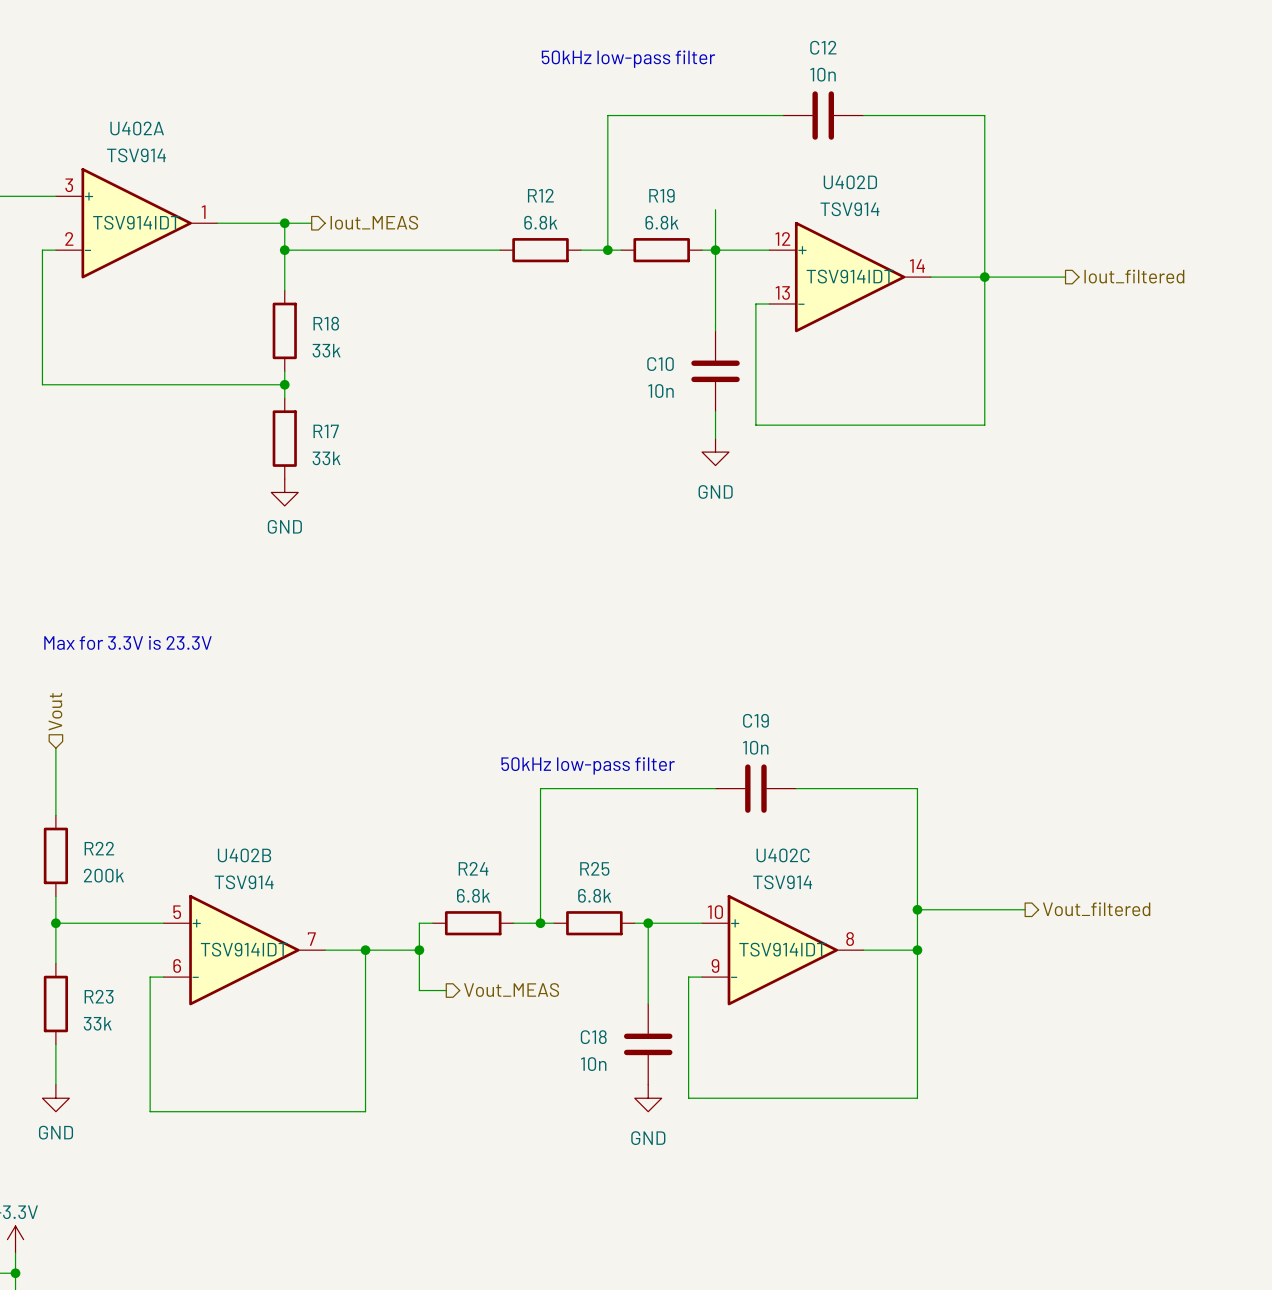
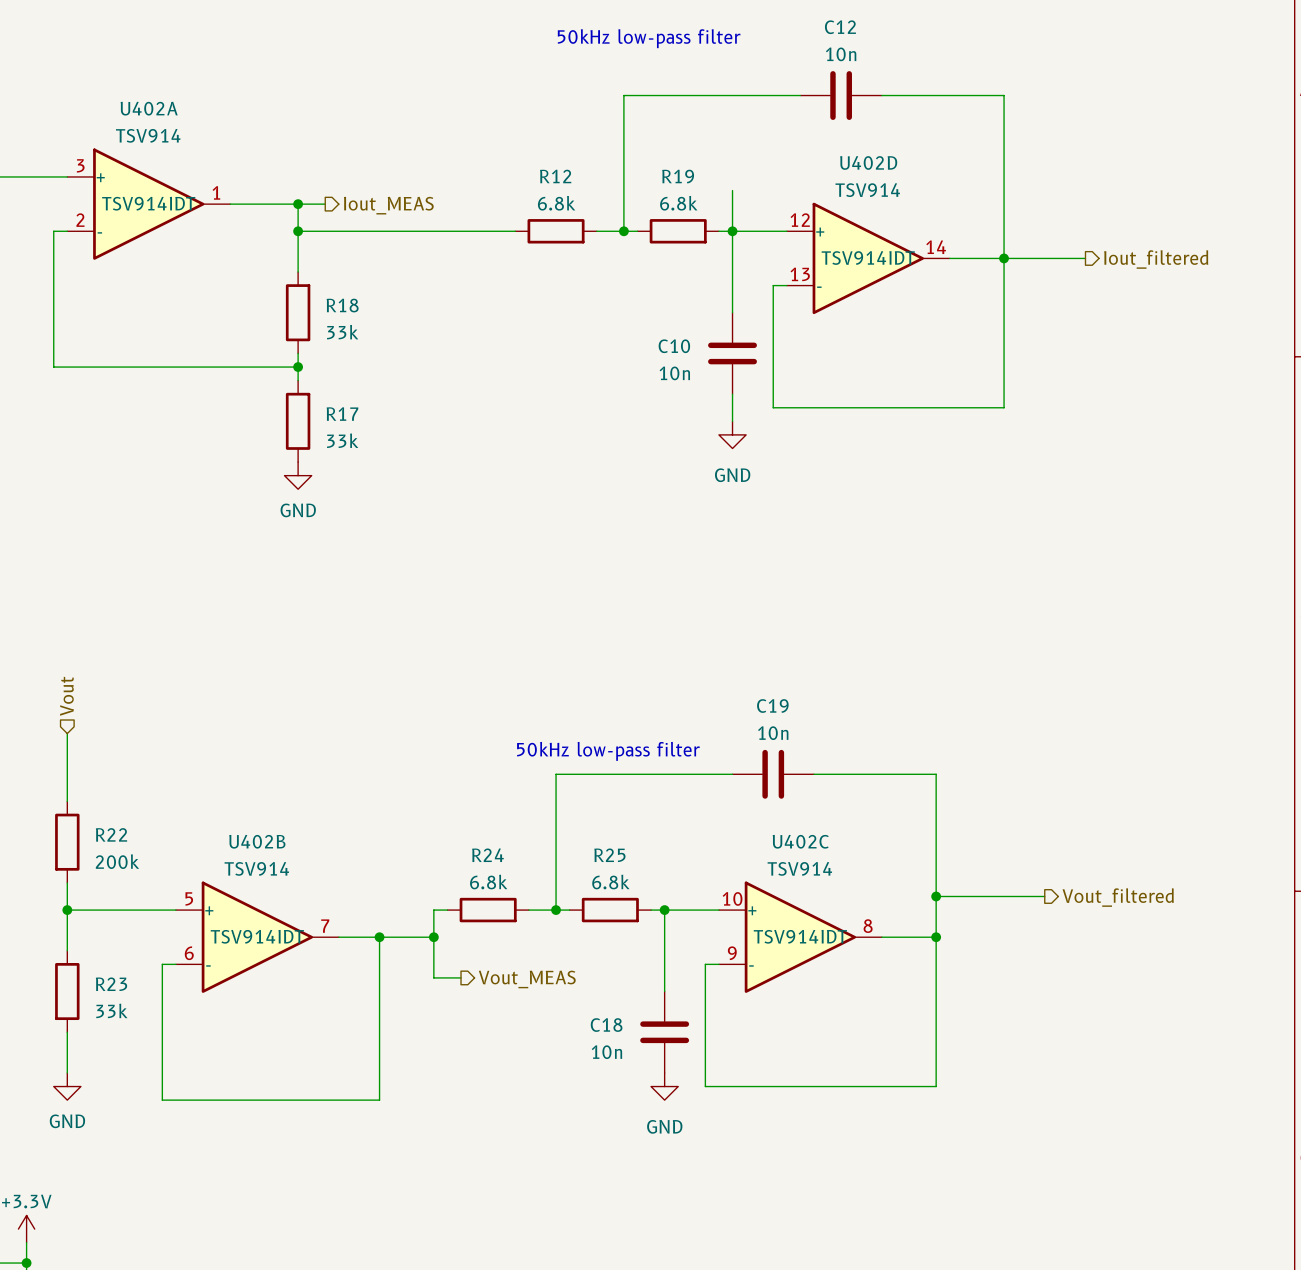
text: Max for 3.3V is 23.3V (127, 642) -> none

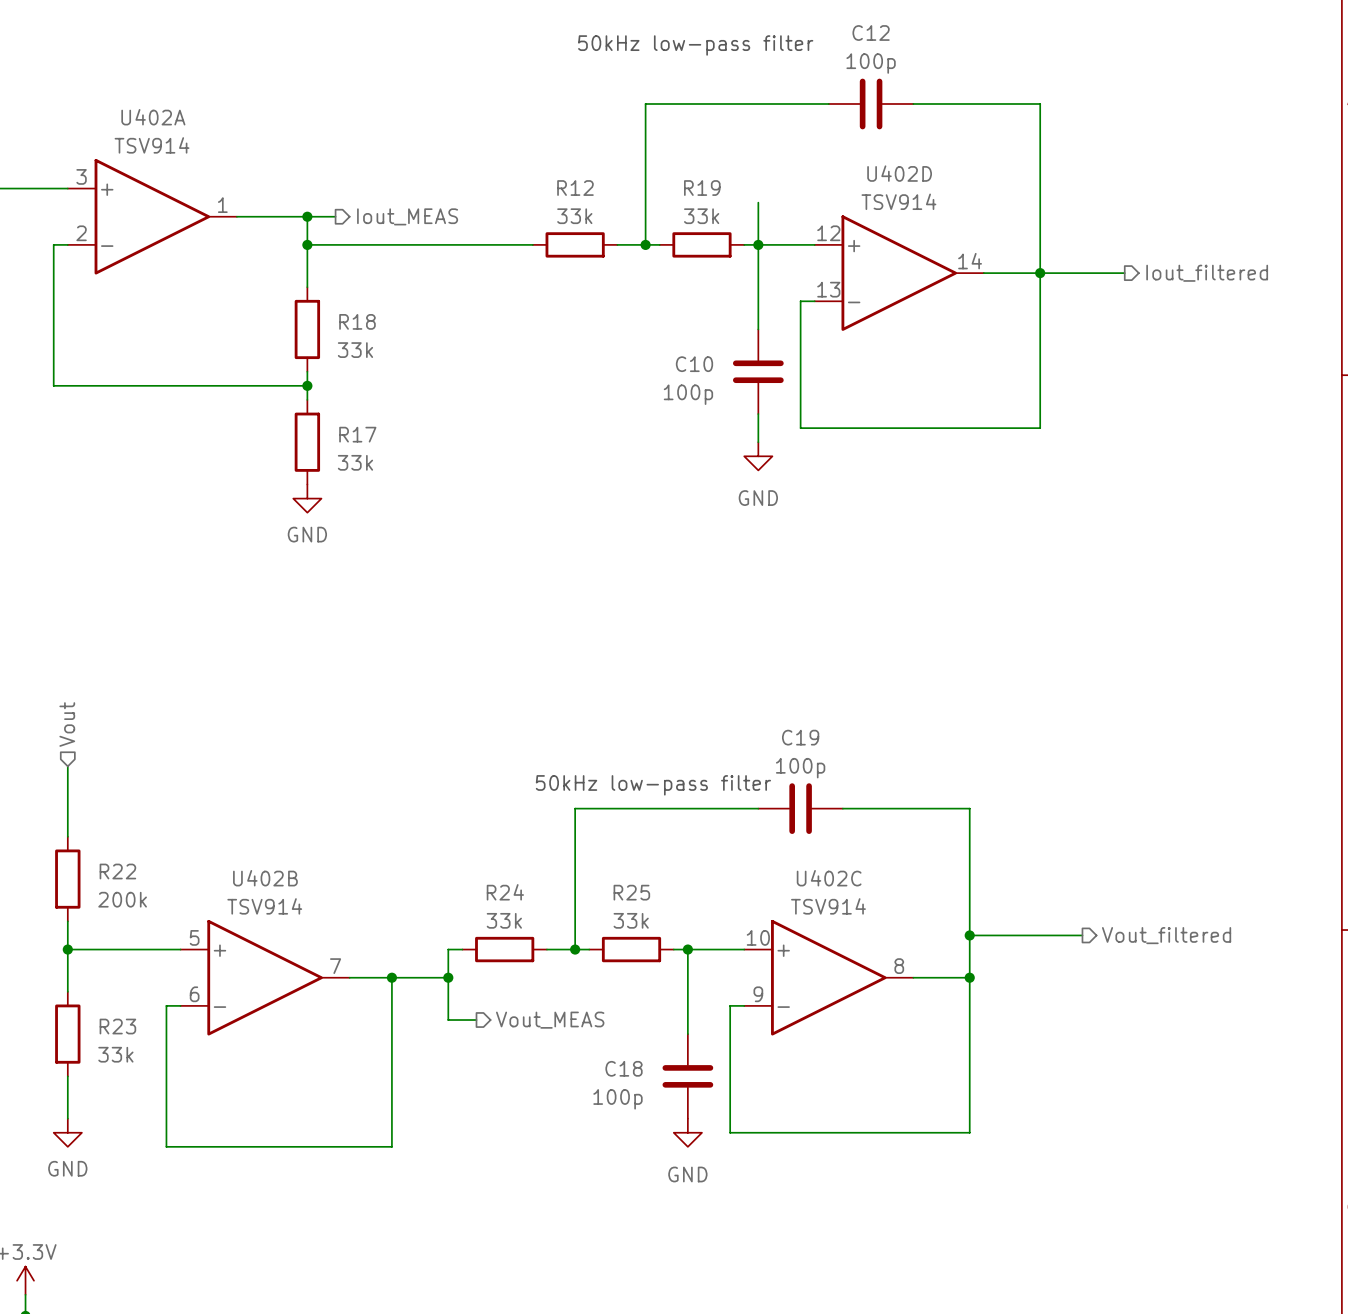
C12 value: 10n (841, 54) -> 100p (871, 63)
U402A text: TSV914IDT (148, 203) -> none
R12 value: 6.8k (556, 203) -> 33k (574, 216)
R19 value: 6.8k (678, 203) -> 33k (701, 216)
U402D text: TSV914IDT (868, 258) -> none
C10 value: 10n (674, 373) -> 100p (688, 394)
C19 value: 10n (773, 733) -> 100p (800, 768)
R24 value: 6.8k (488, 882) -> 33k (504, 920)
R25 value: 6.8k (610, 882) -> 33k (631, 920)
U402B text: TSV914IDT (257, 936) -> none
U402C text: TSV914IDT (800, 936) -> none
C18 value: 10n (606, 1052) -> 100p (617, 1099)

